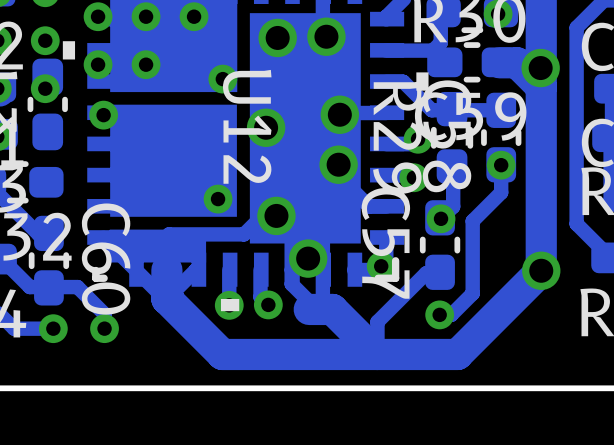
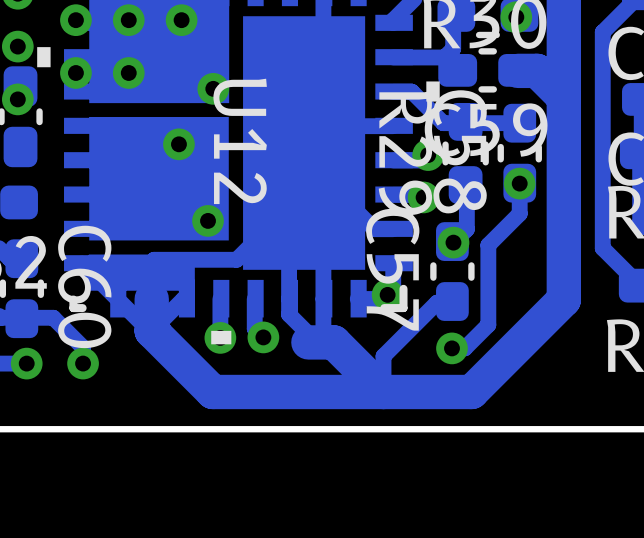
via: (326, 36) -> none
via: (277, 37) -> none
via: (540, 68) -> none
via: (339, 114) -> none
via position: (103, 115) -> (178, 144)
via: (266, 127) -> none
via: (338, 164) -> none
via: (276, 215) -> none
via: (308, 258) -> none
via: (541, 270) -> none

